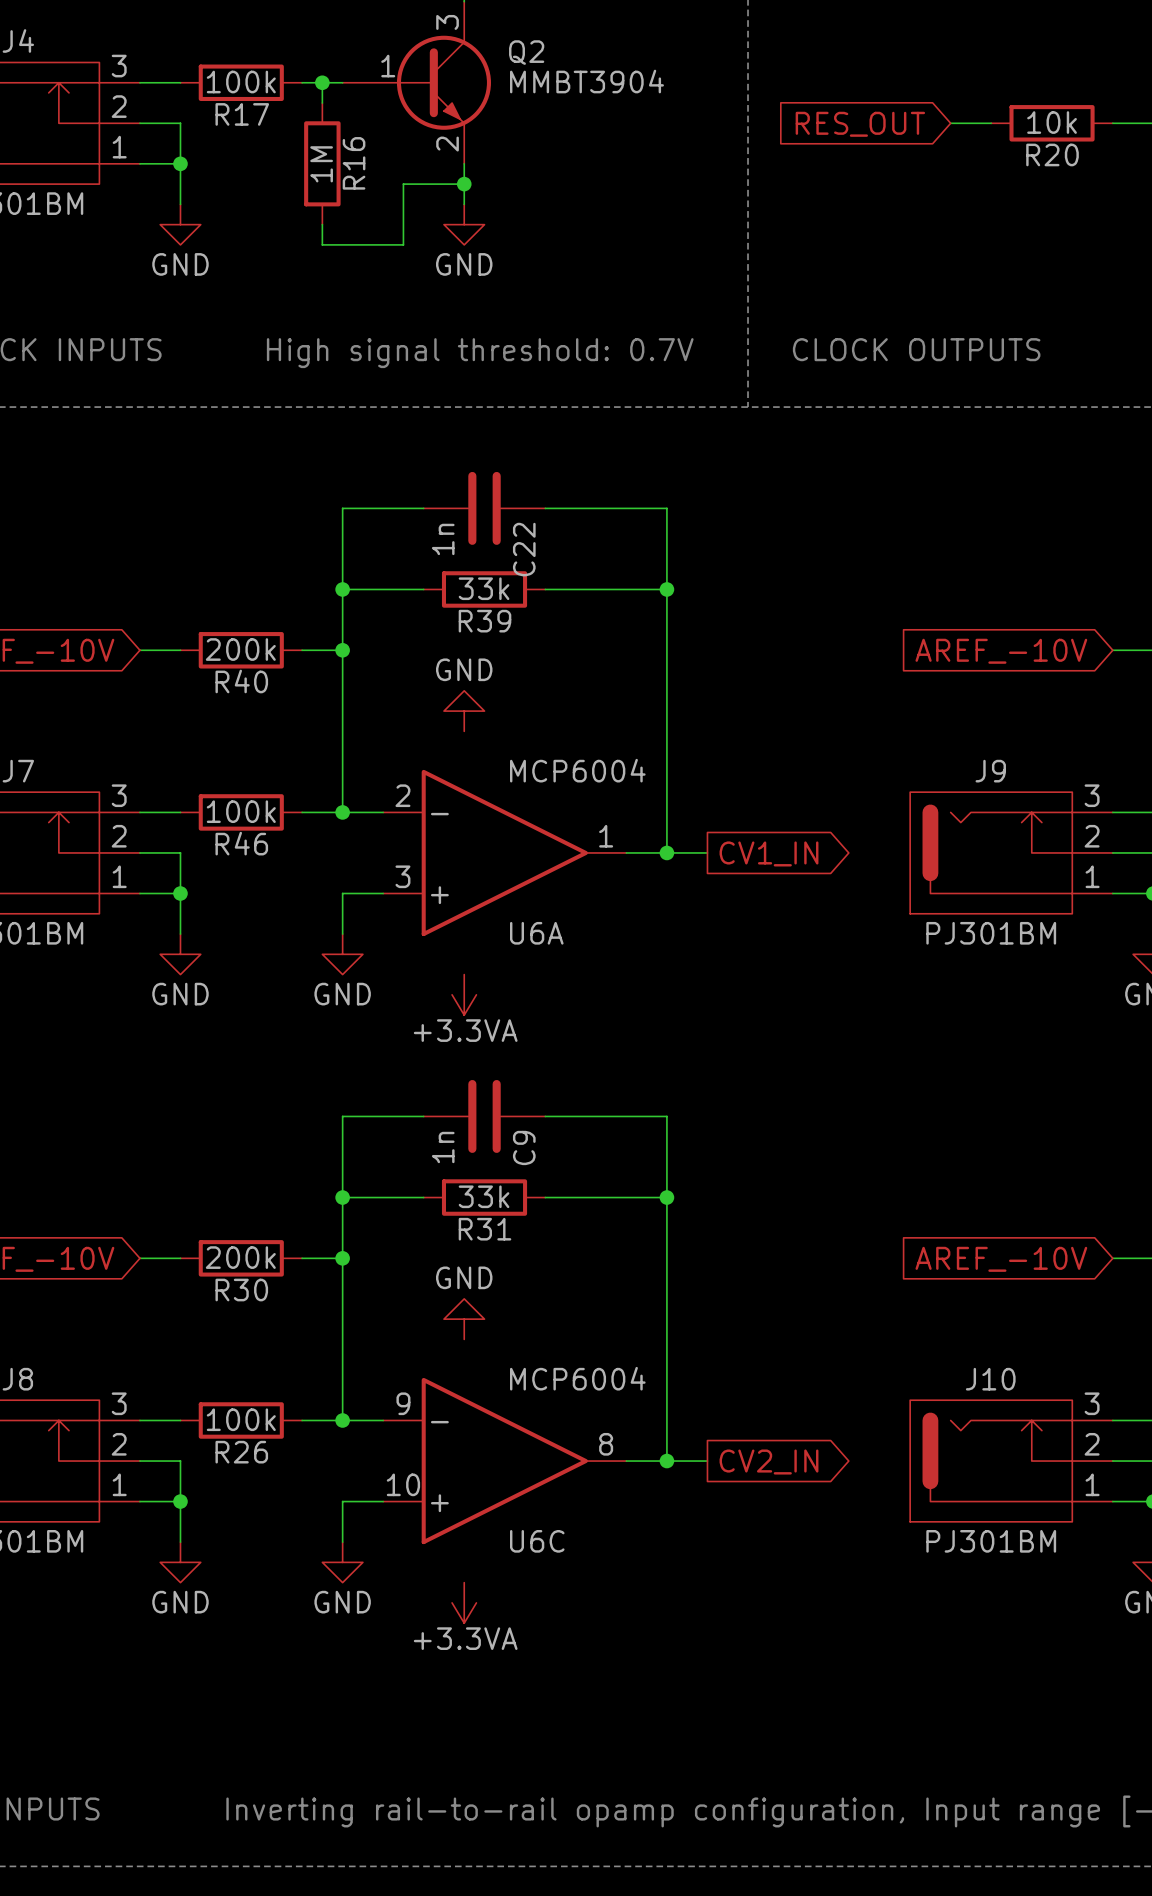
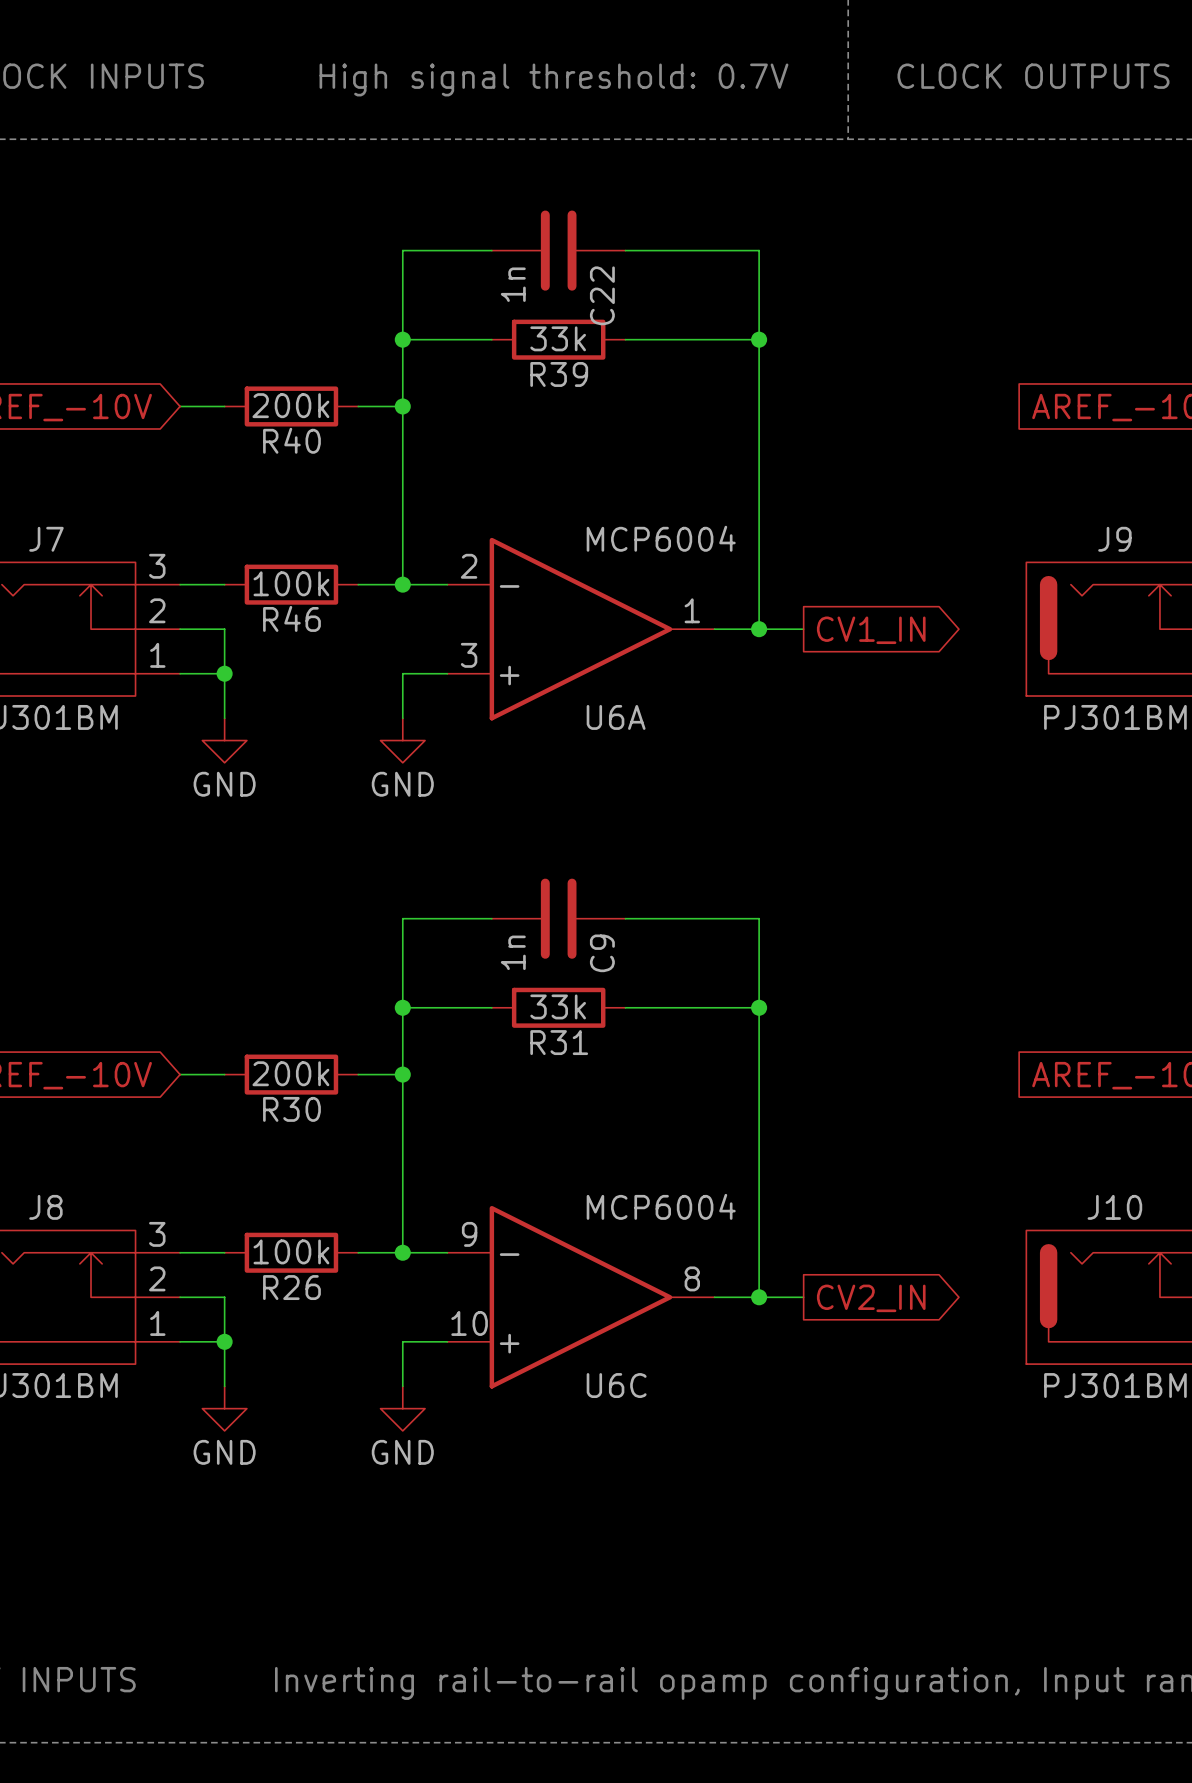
power symbol: GND (464, 711) -> none
power symbol: +3.3VA (464, 994) -> none
power symbol: GND (464, 1319) -> none
power symbol: +3.3VA (464, 1602) -> none

